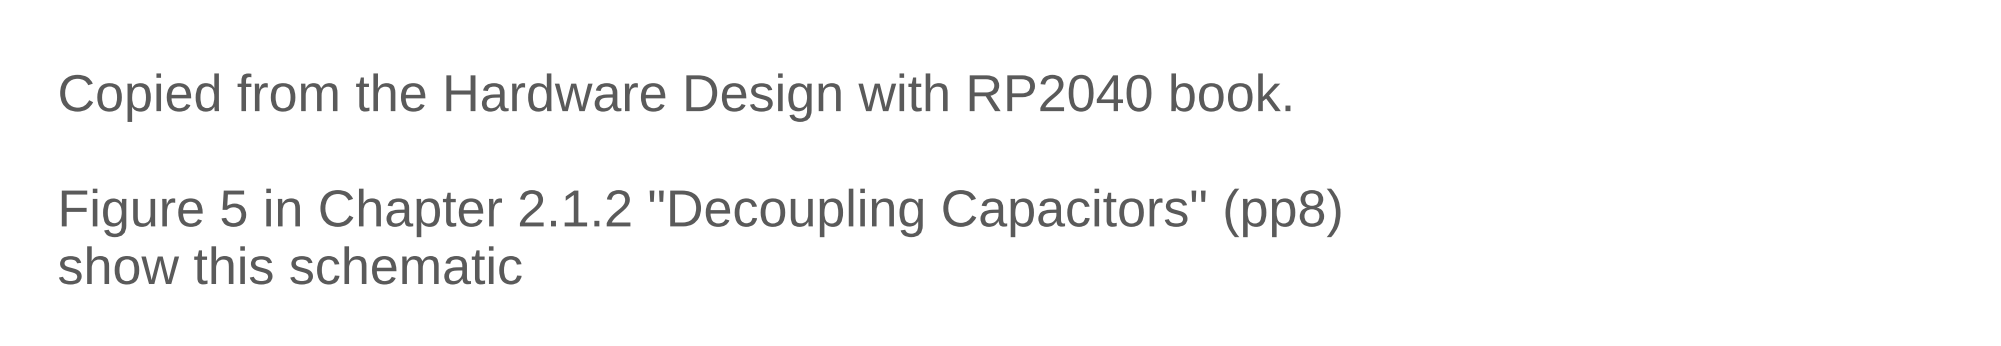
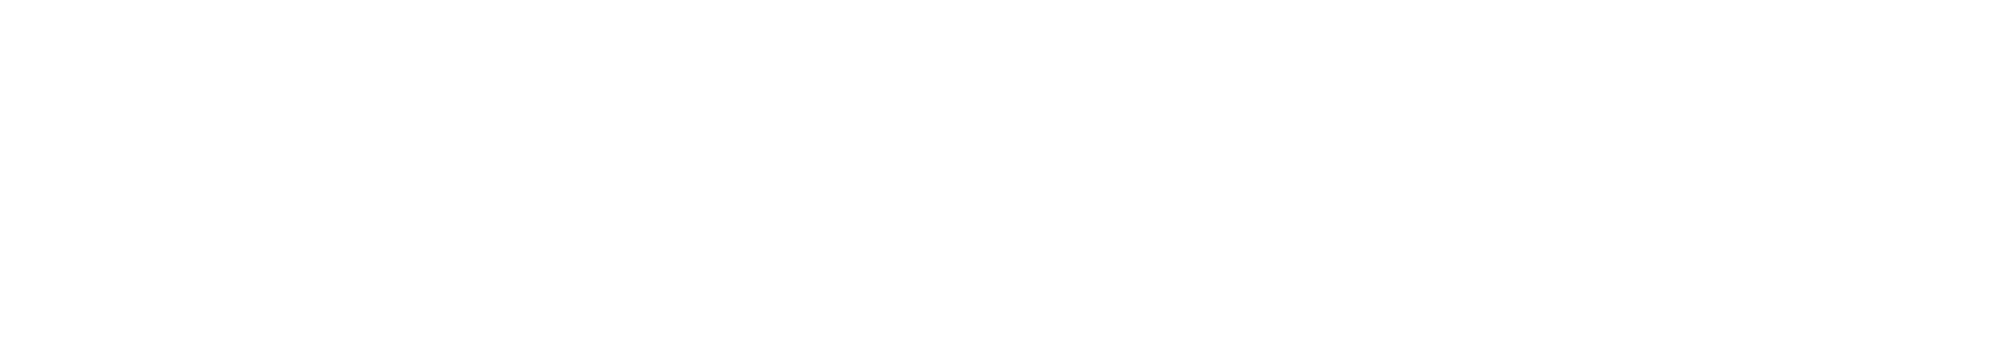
text: Copied from the Hardware Design with RP2040 book. (675, 97) -> none
text: Figure 5 in Chapter 2.1.2 "Decoupling Capacitors" (pp8) (701, 212) -> none
text: show this schematic (290, 265) -> none

